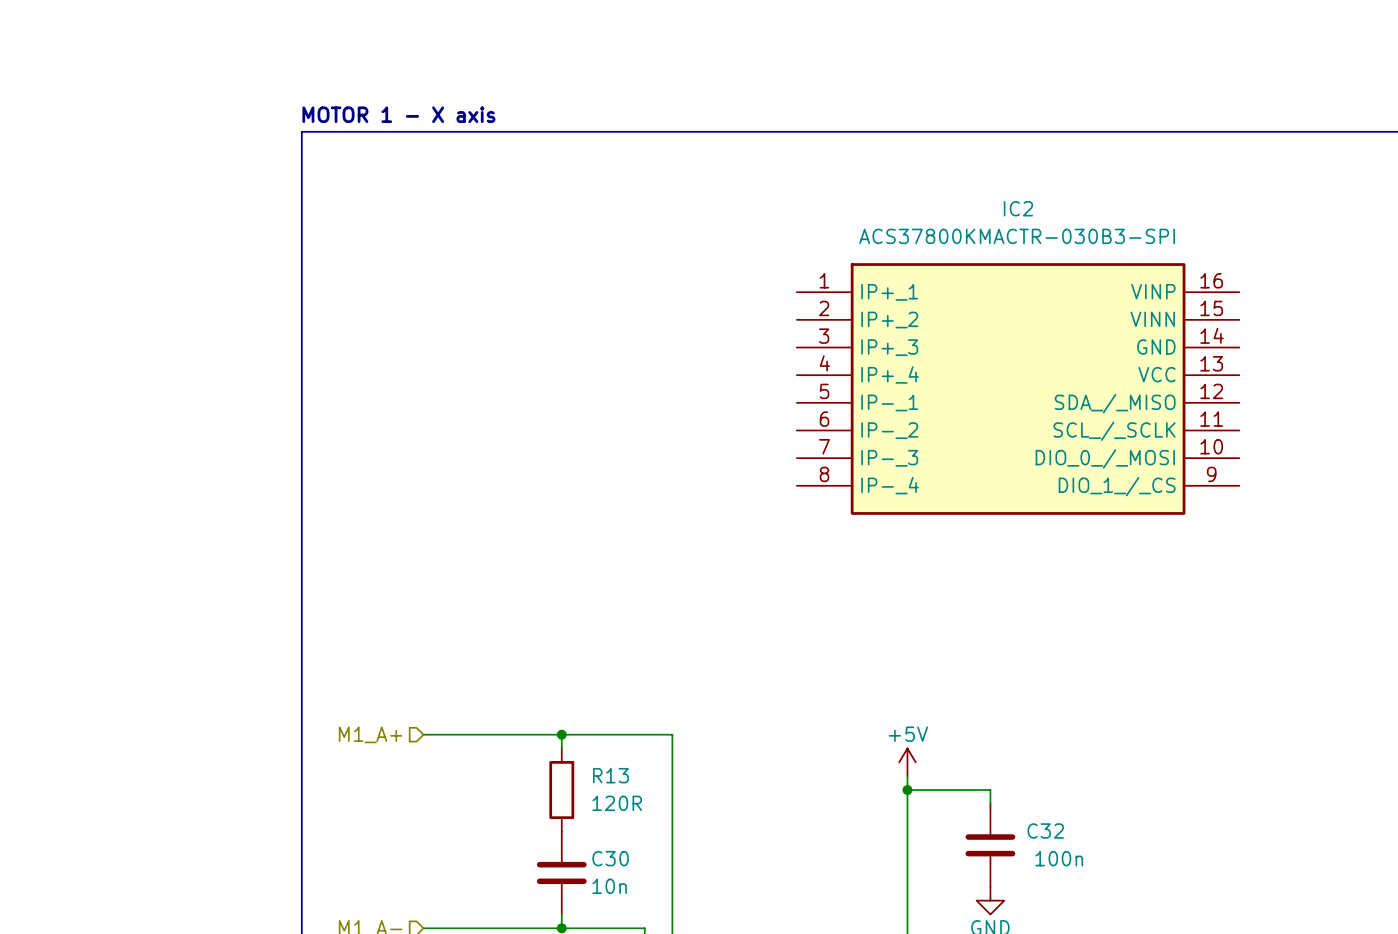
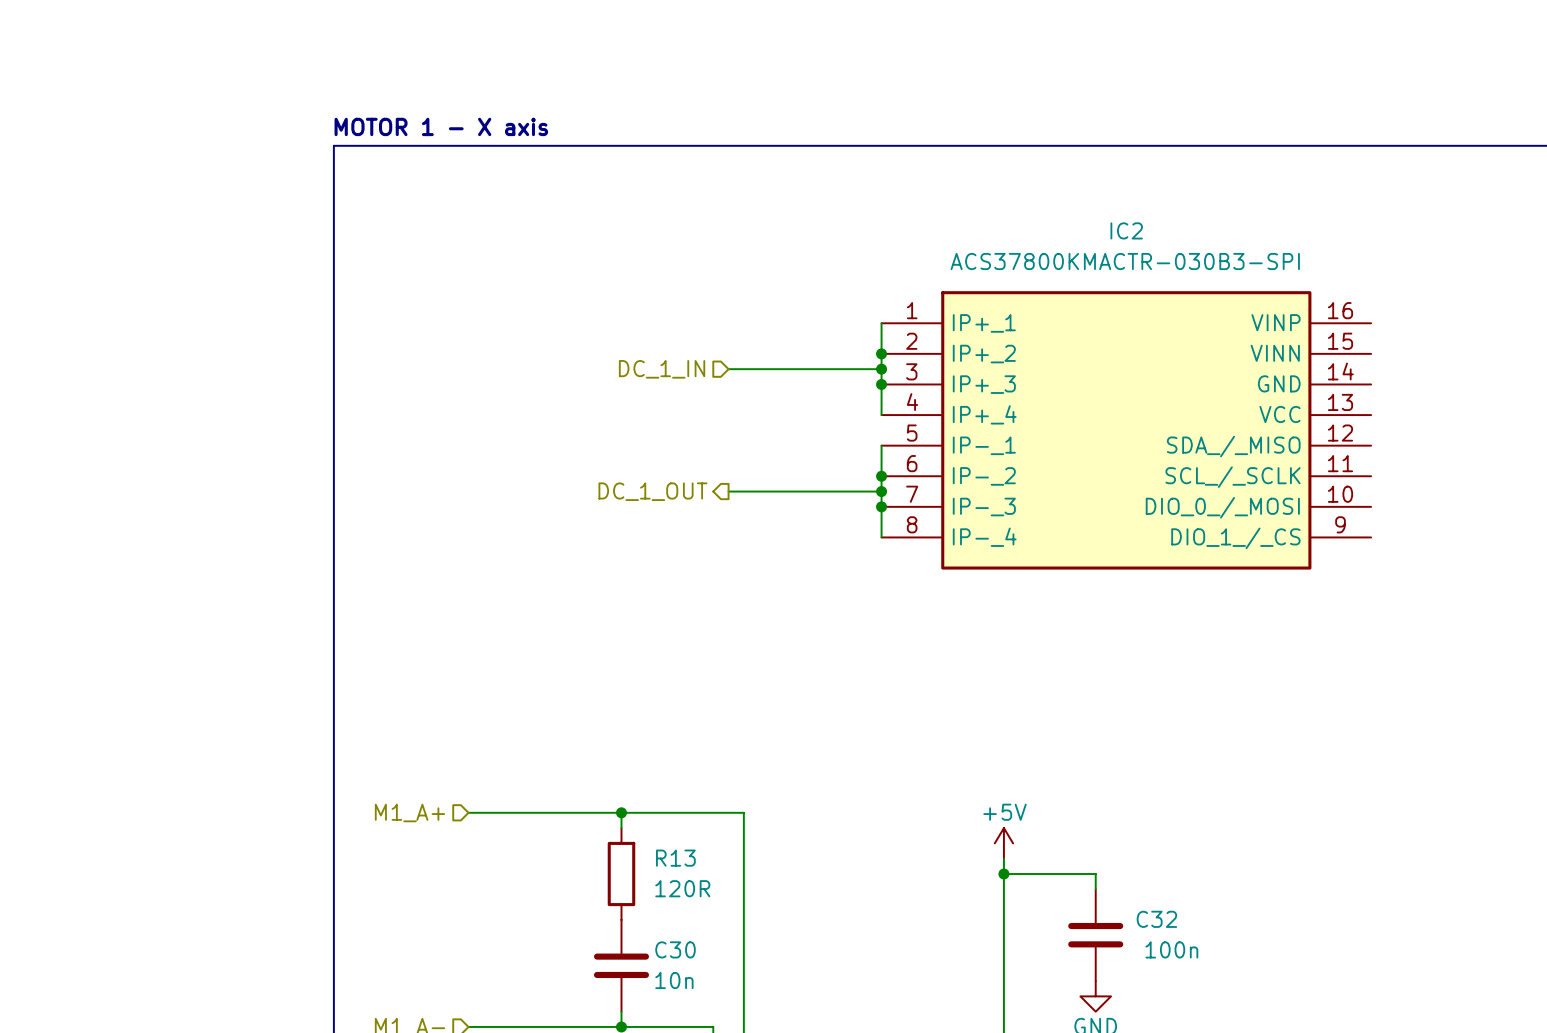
wire: none -> (881, 323) (881, 415)
junction: none -> (881, 353)
hierarchical label: none -> DC_1_IN (662, 369)
wire: none -> (728, 369) (881, 369)
junction: none -> (881, 369)
junction: none -> (881, 384)
wire: none -> (881, 445) (881, 537)
junction: none -> (881, 476)
hierarchical label: none -> DC_1_OUT (652, 491)
wire: none -> (728, 491) (881, 491)
junction: none -> (881, 491)
junction: none -> (881, 506)

